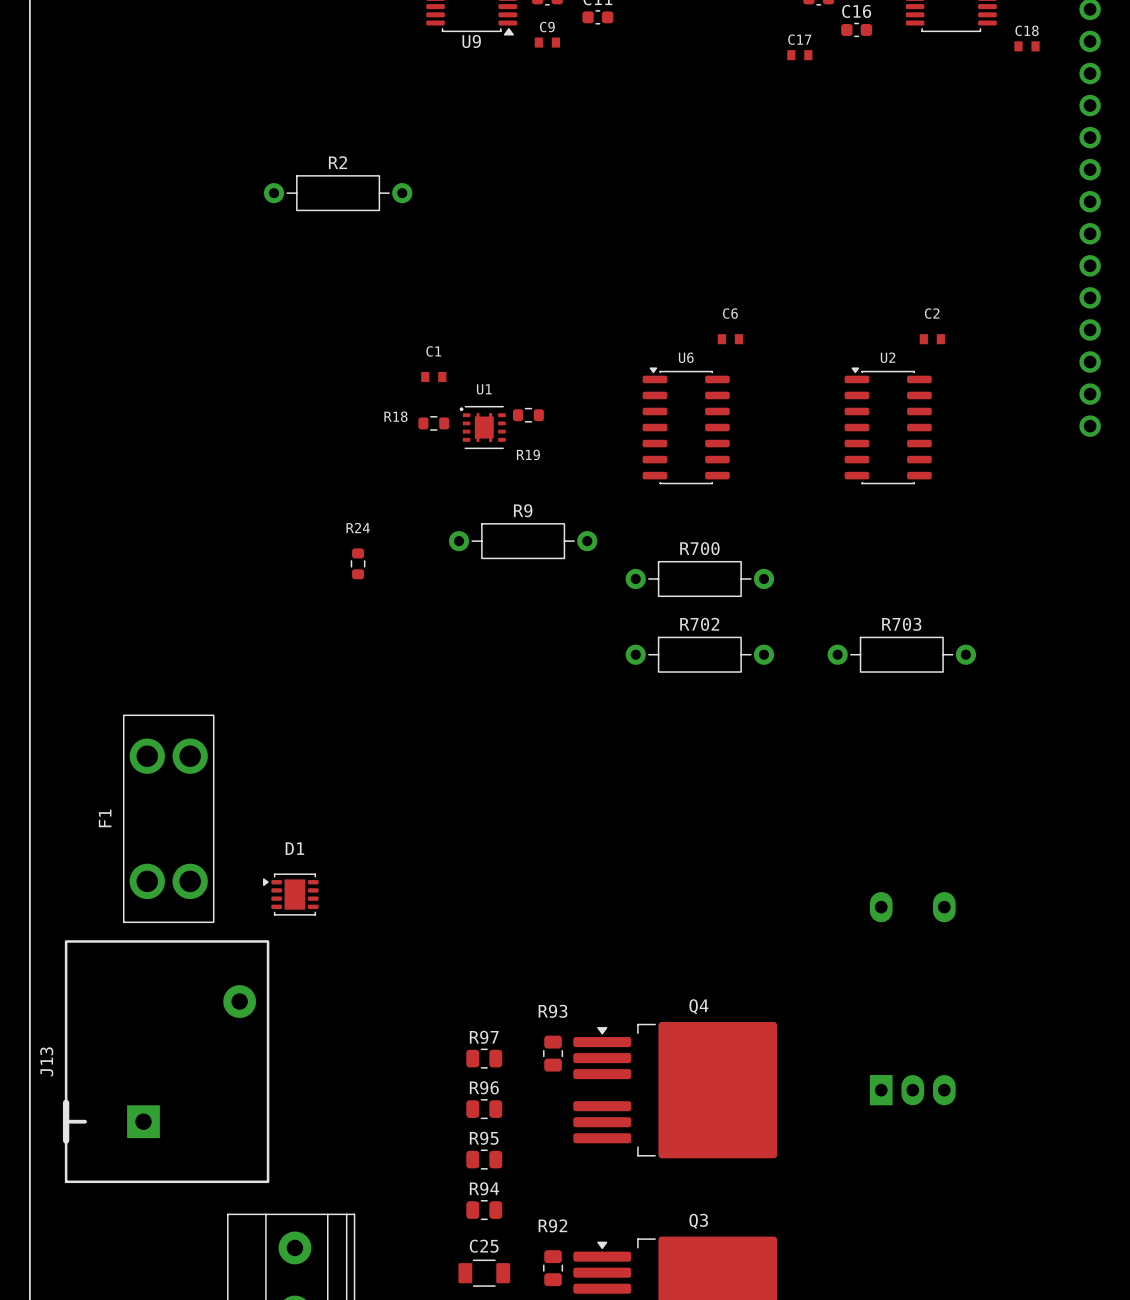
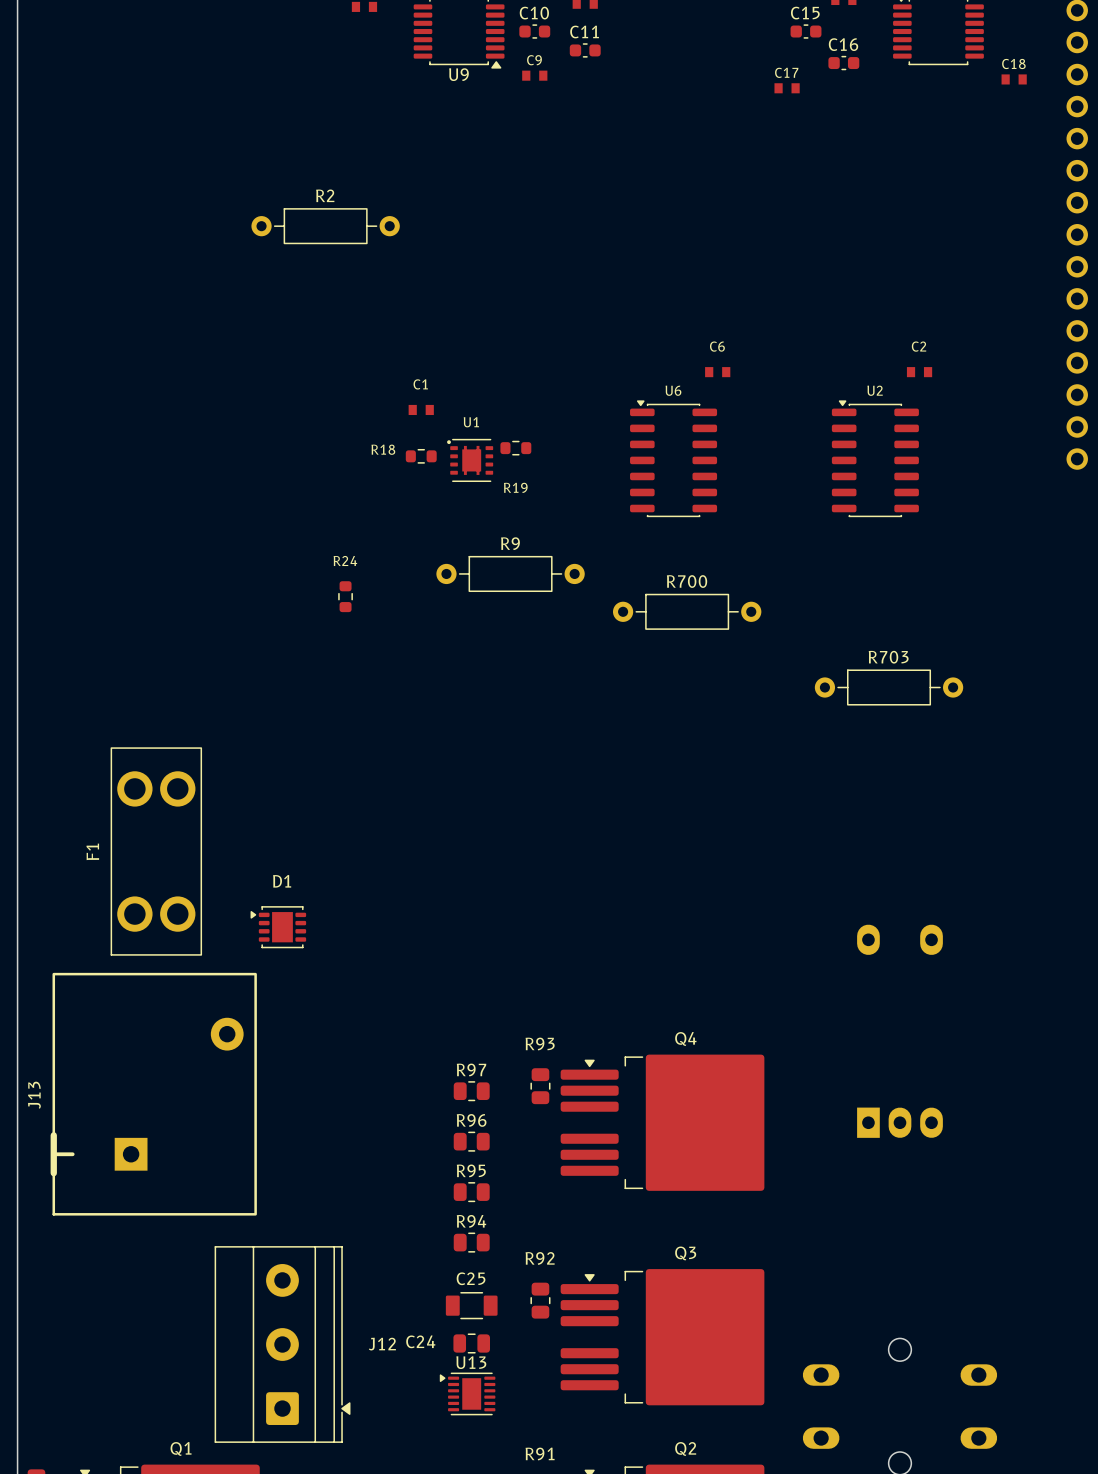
R702: (699, 654) -> none

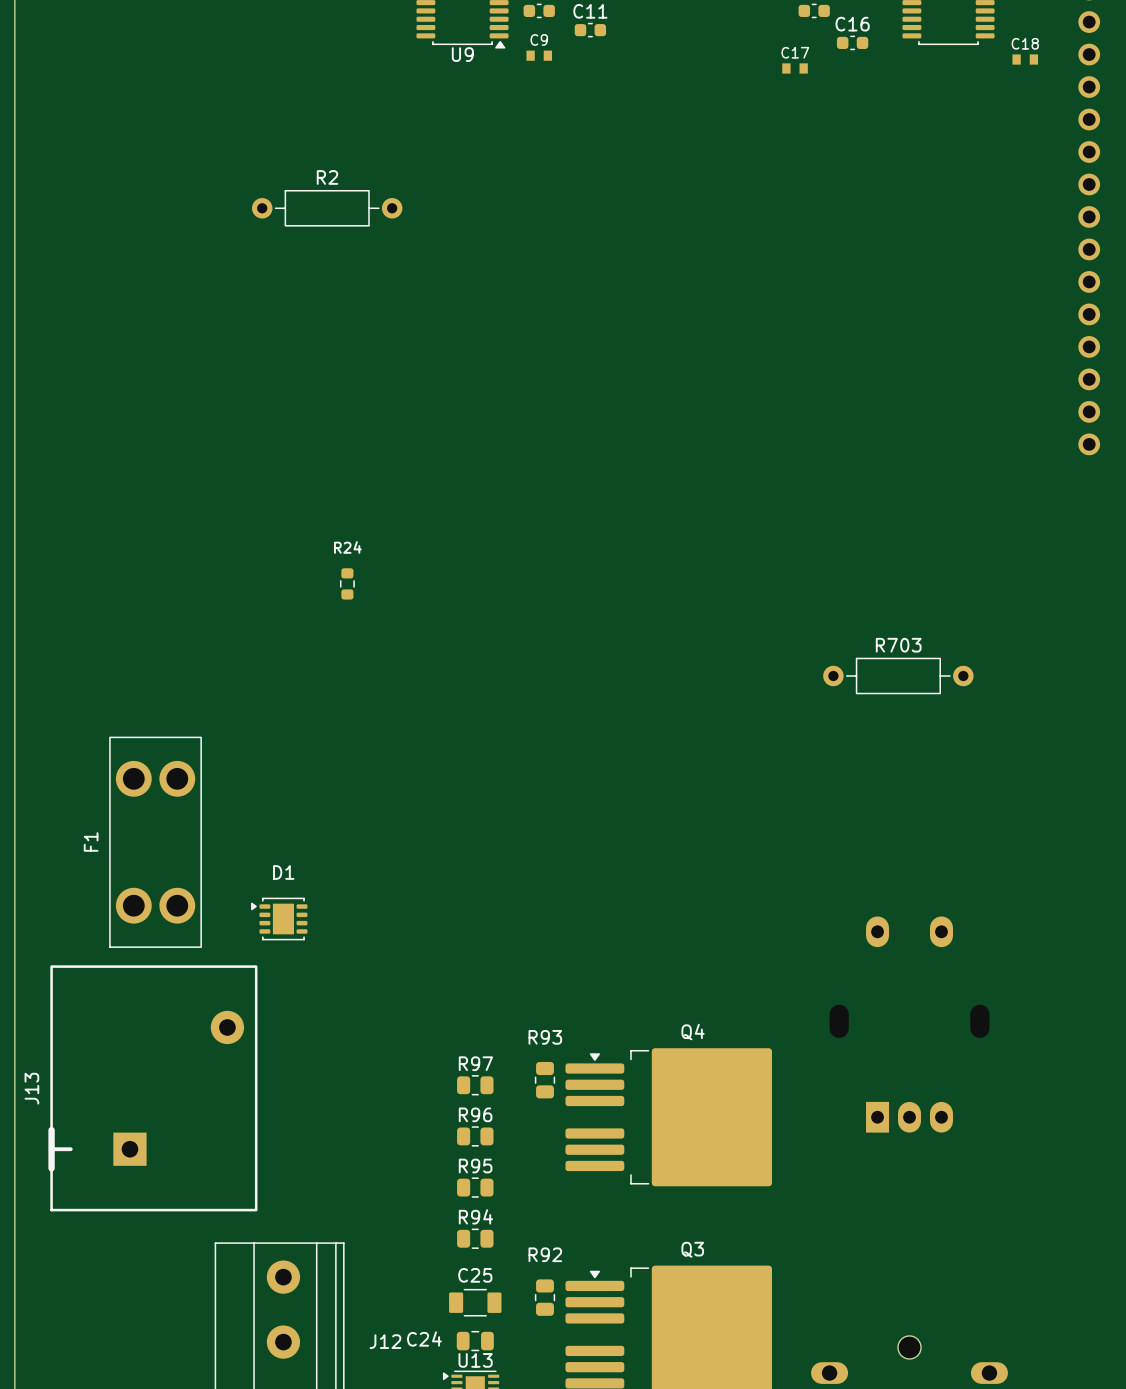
C6: (717, 372) -> none
C2: (919, 372) -> none
C1: (421, 409) -> none
R19: (515, 448) -> none
R18: (421, 456) -> none
U6: (673, 458) -> none
U2: (875, 458) -> none
U1: (470, 460) -> none
R9: (510, 573) -> none
R700: (687, 611) -> none

